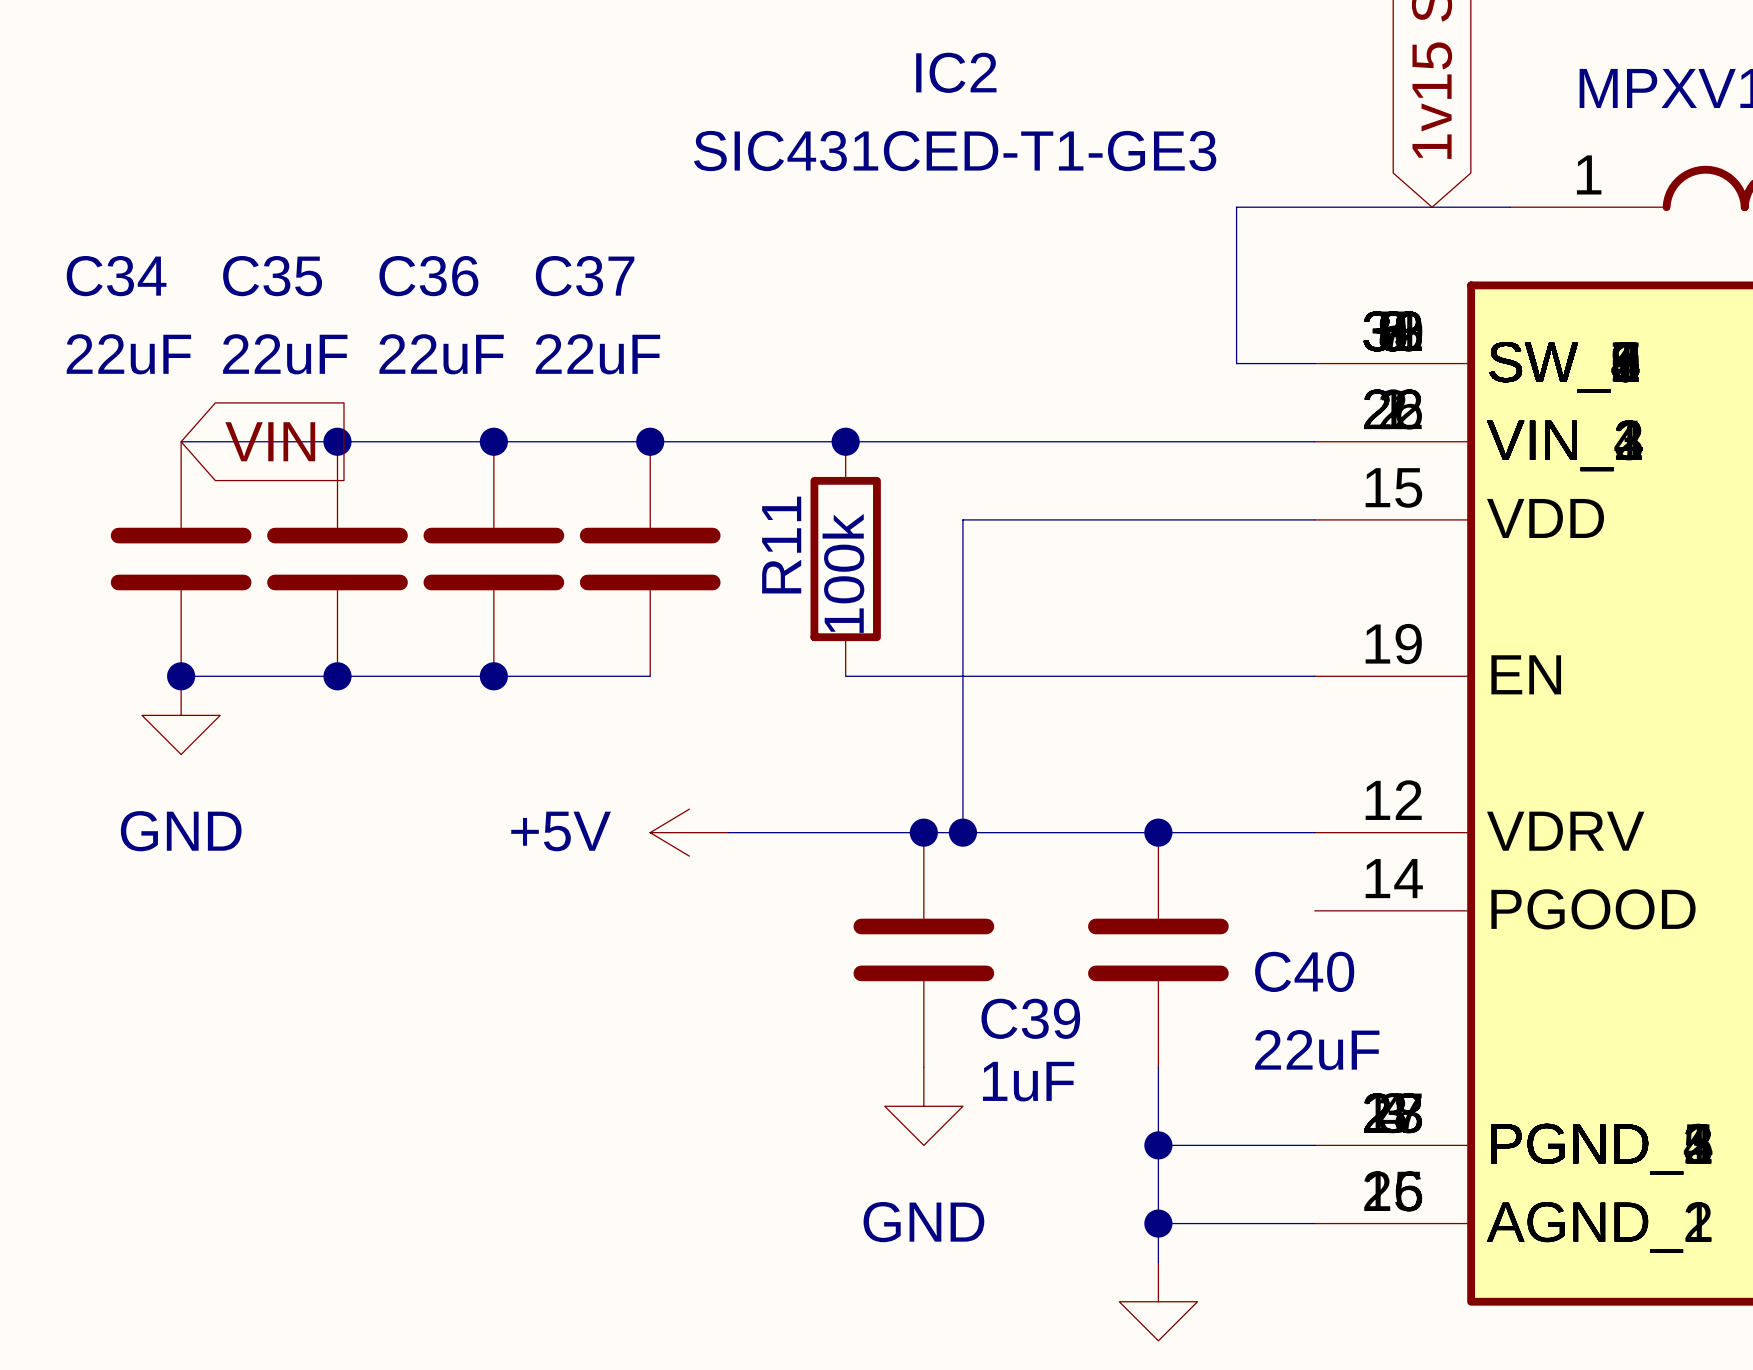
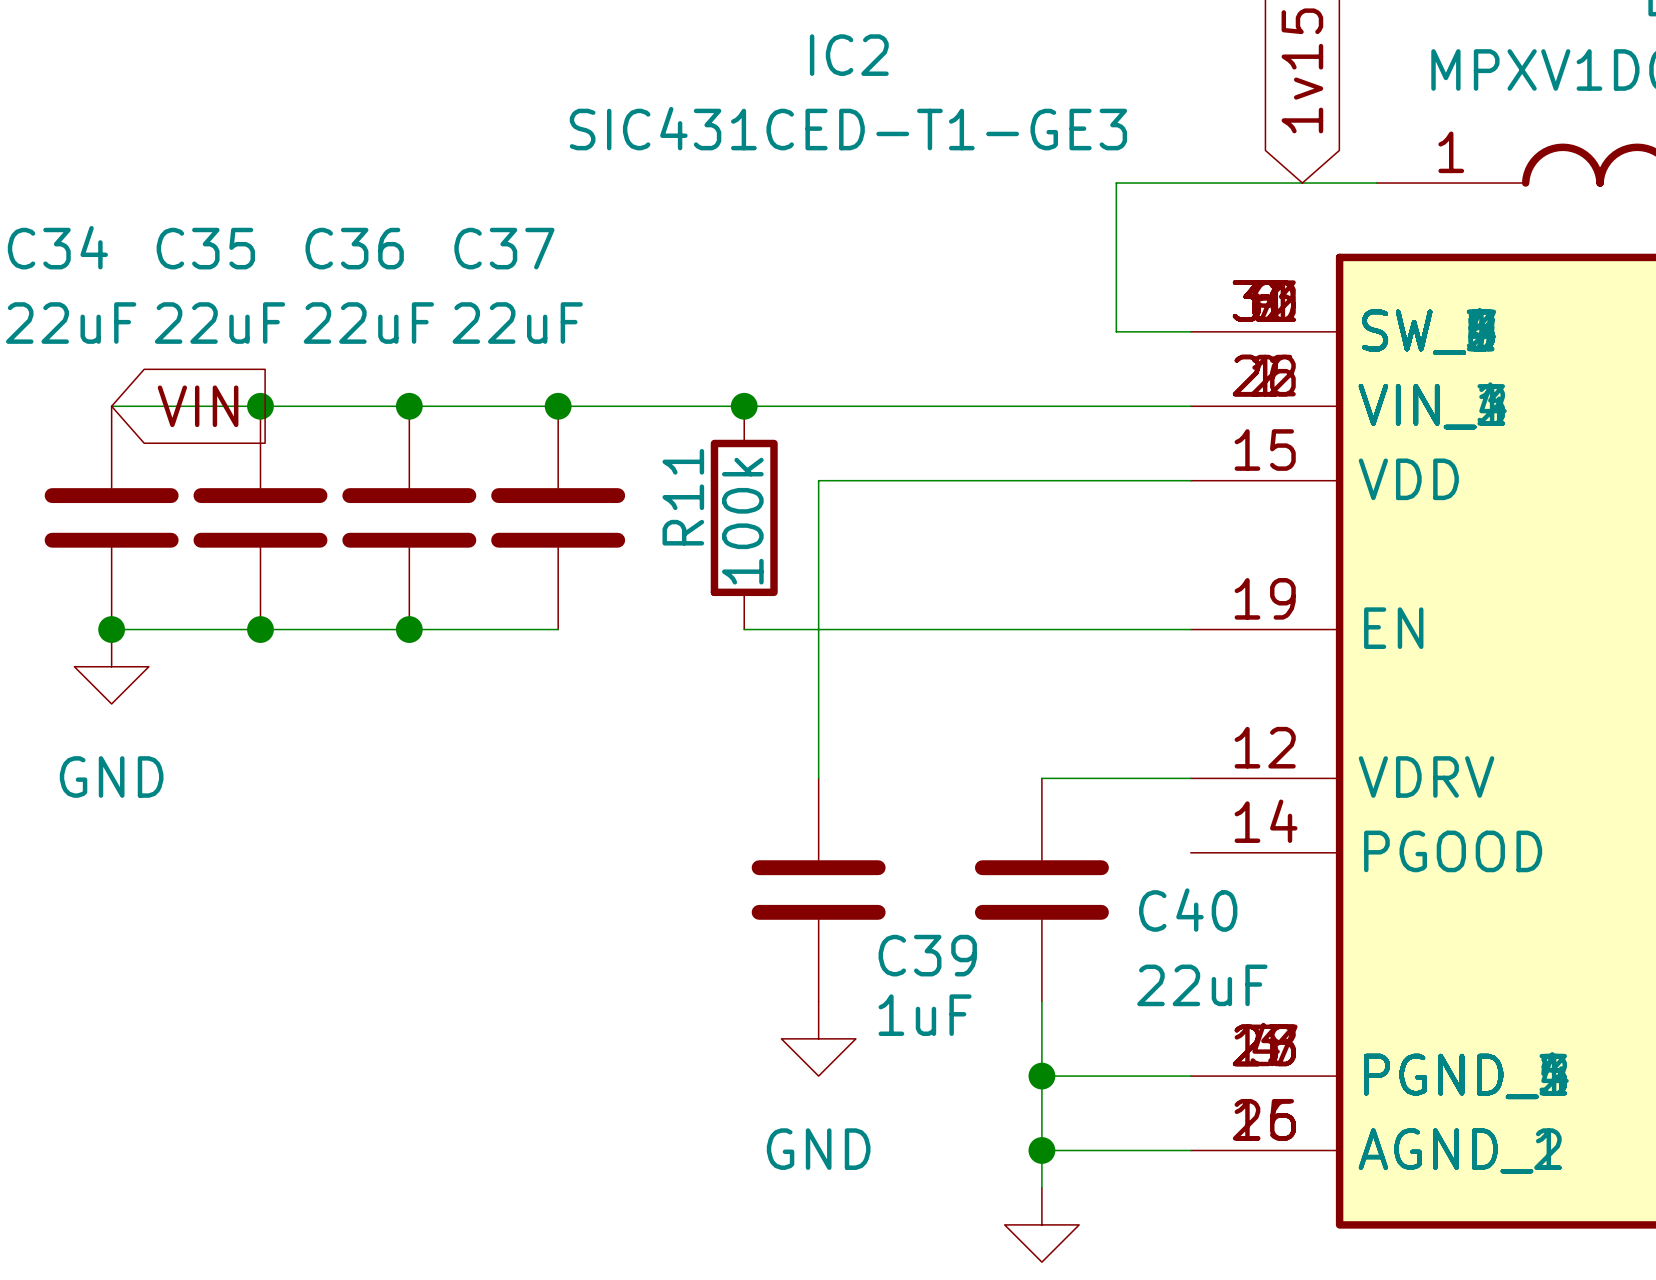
wire: (962, 519) (962, 832) -> (855, 480) (818, 480) (818, 778)
power symbol: +5V (689, 832) -> none
wire: (728, 832) (1158, 832) -> none
junction: (923, 832) -> none
junction: (962, 832) -> none
junction: (1158, 832) -> none

